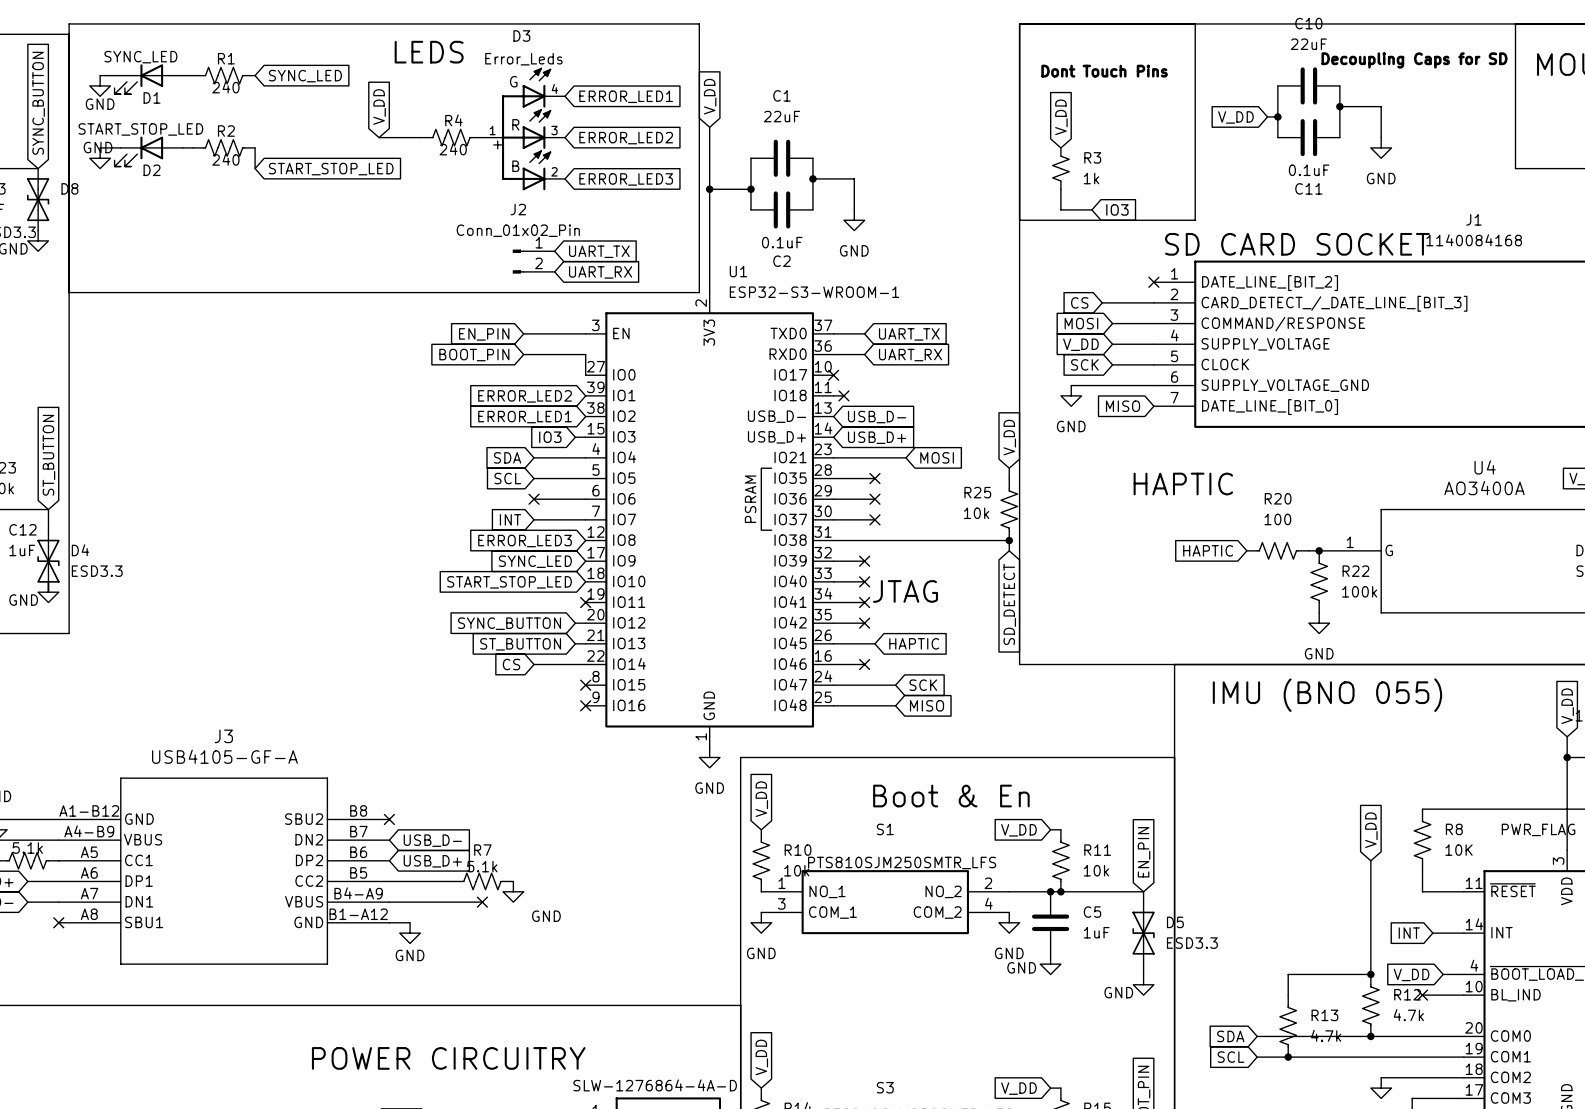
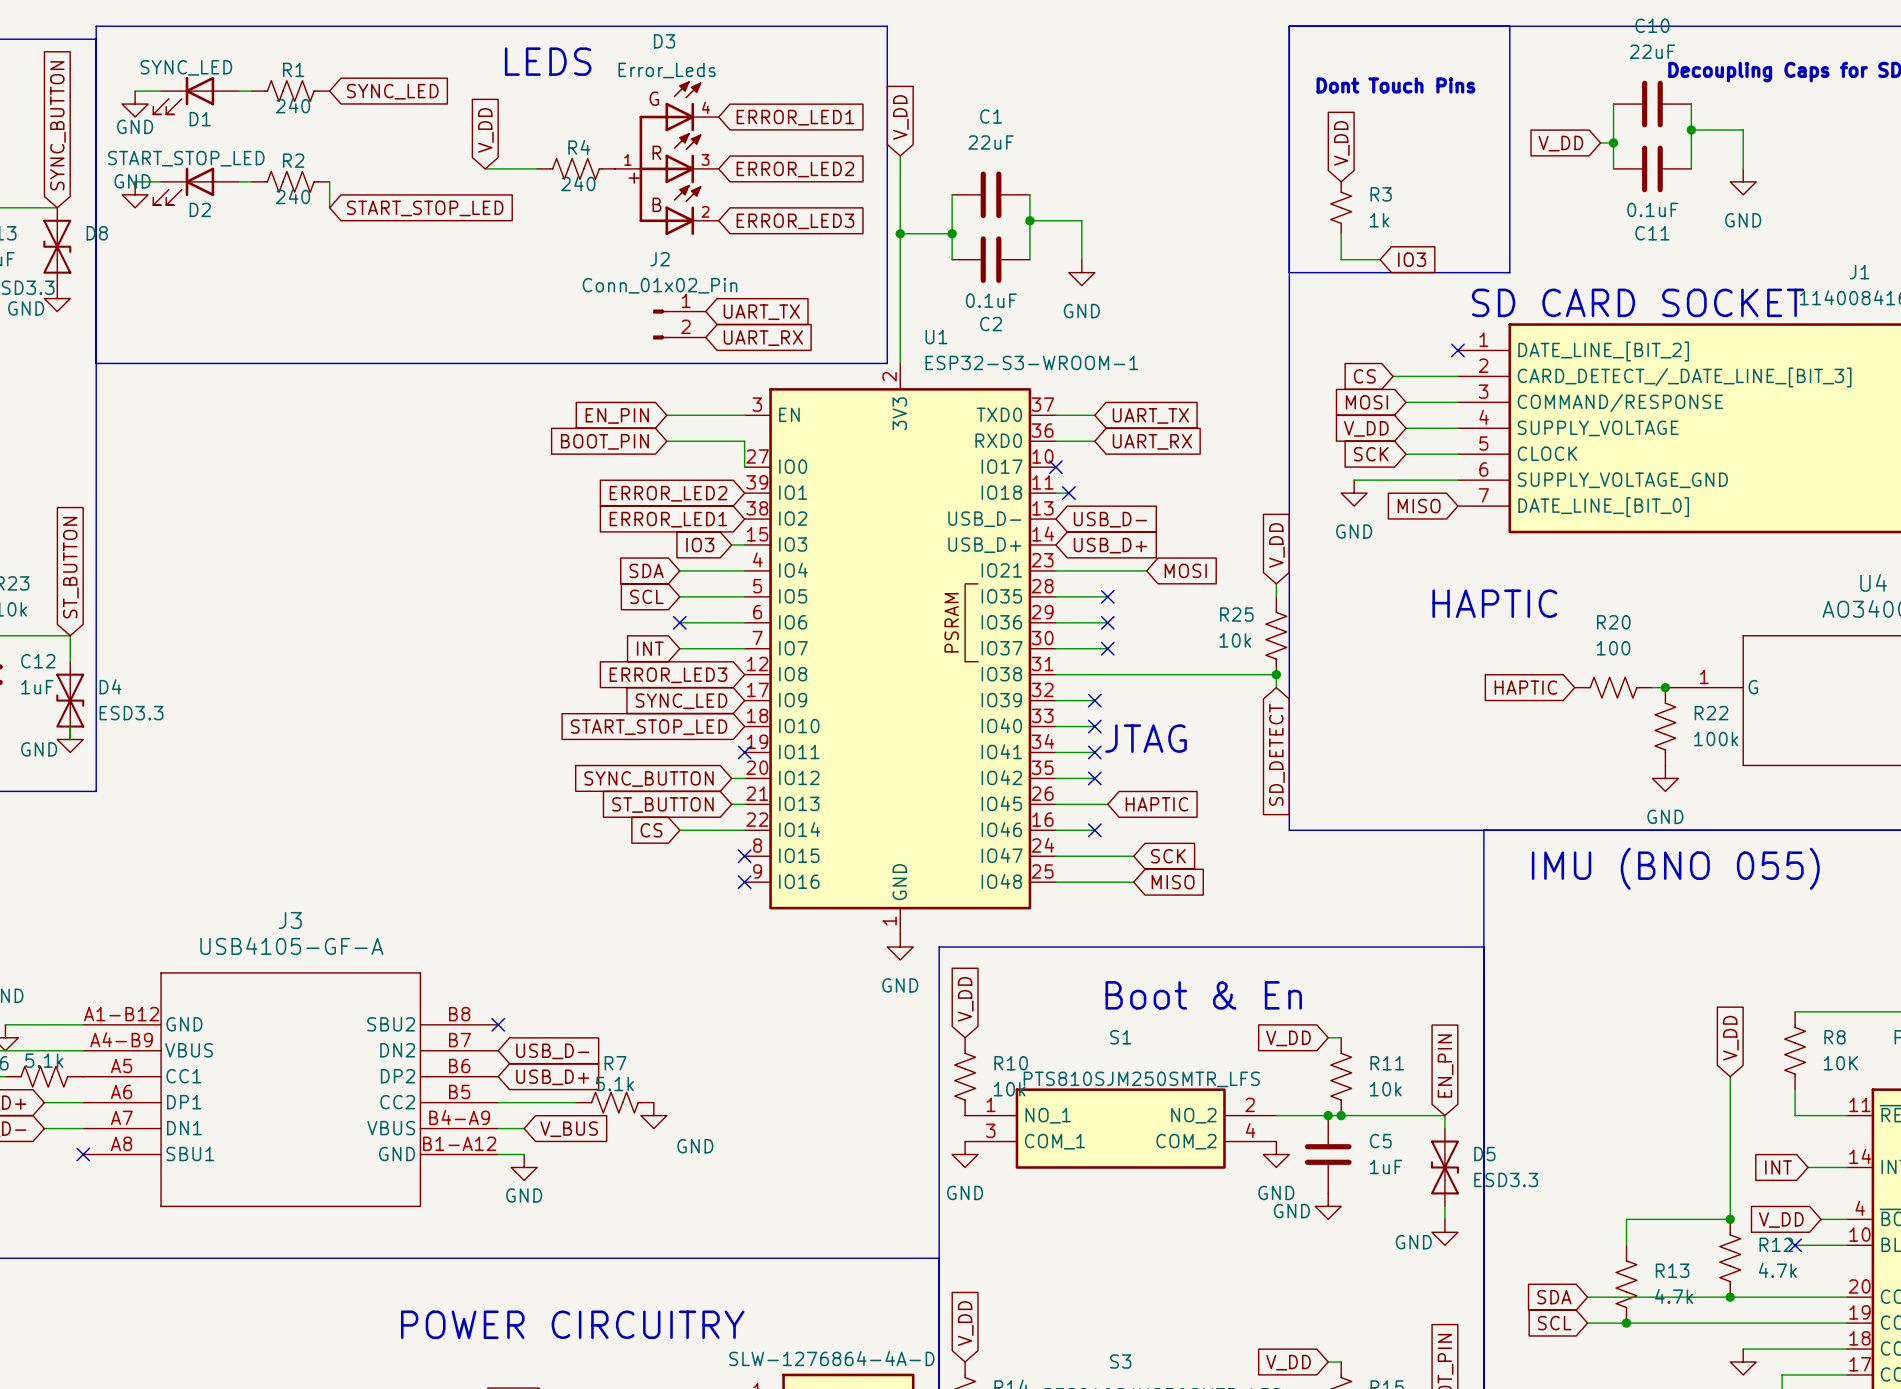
wire: (410, 902) (482, 902) -> none
global label: none -> V_BUS (569, 1129)
no-connect mark: (482, 902) -> none

